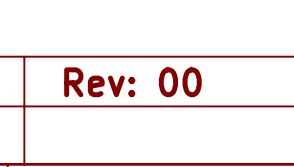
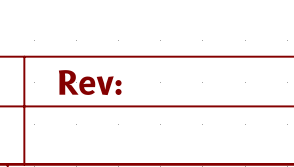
title block: Rev: 00 (132, 82) -> Rev: (90, 82)

